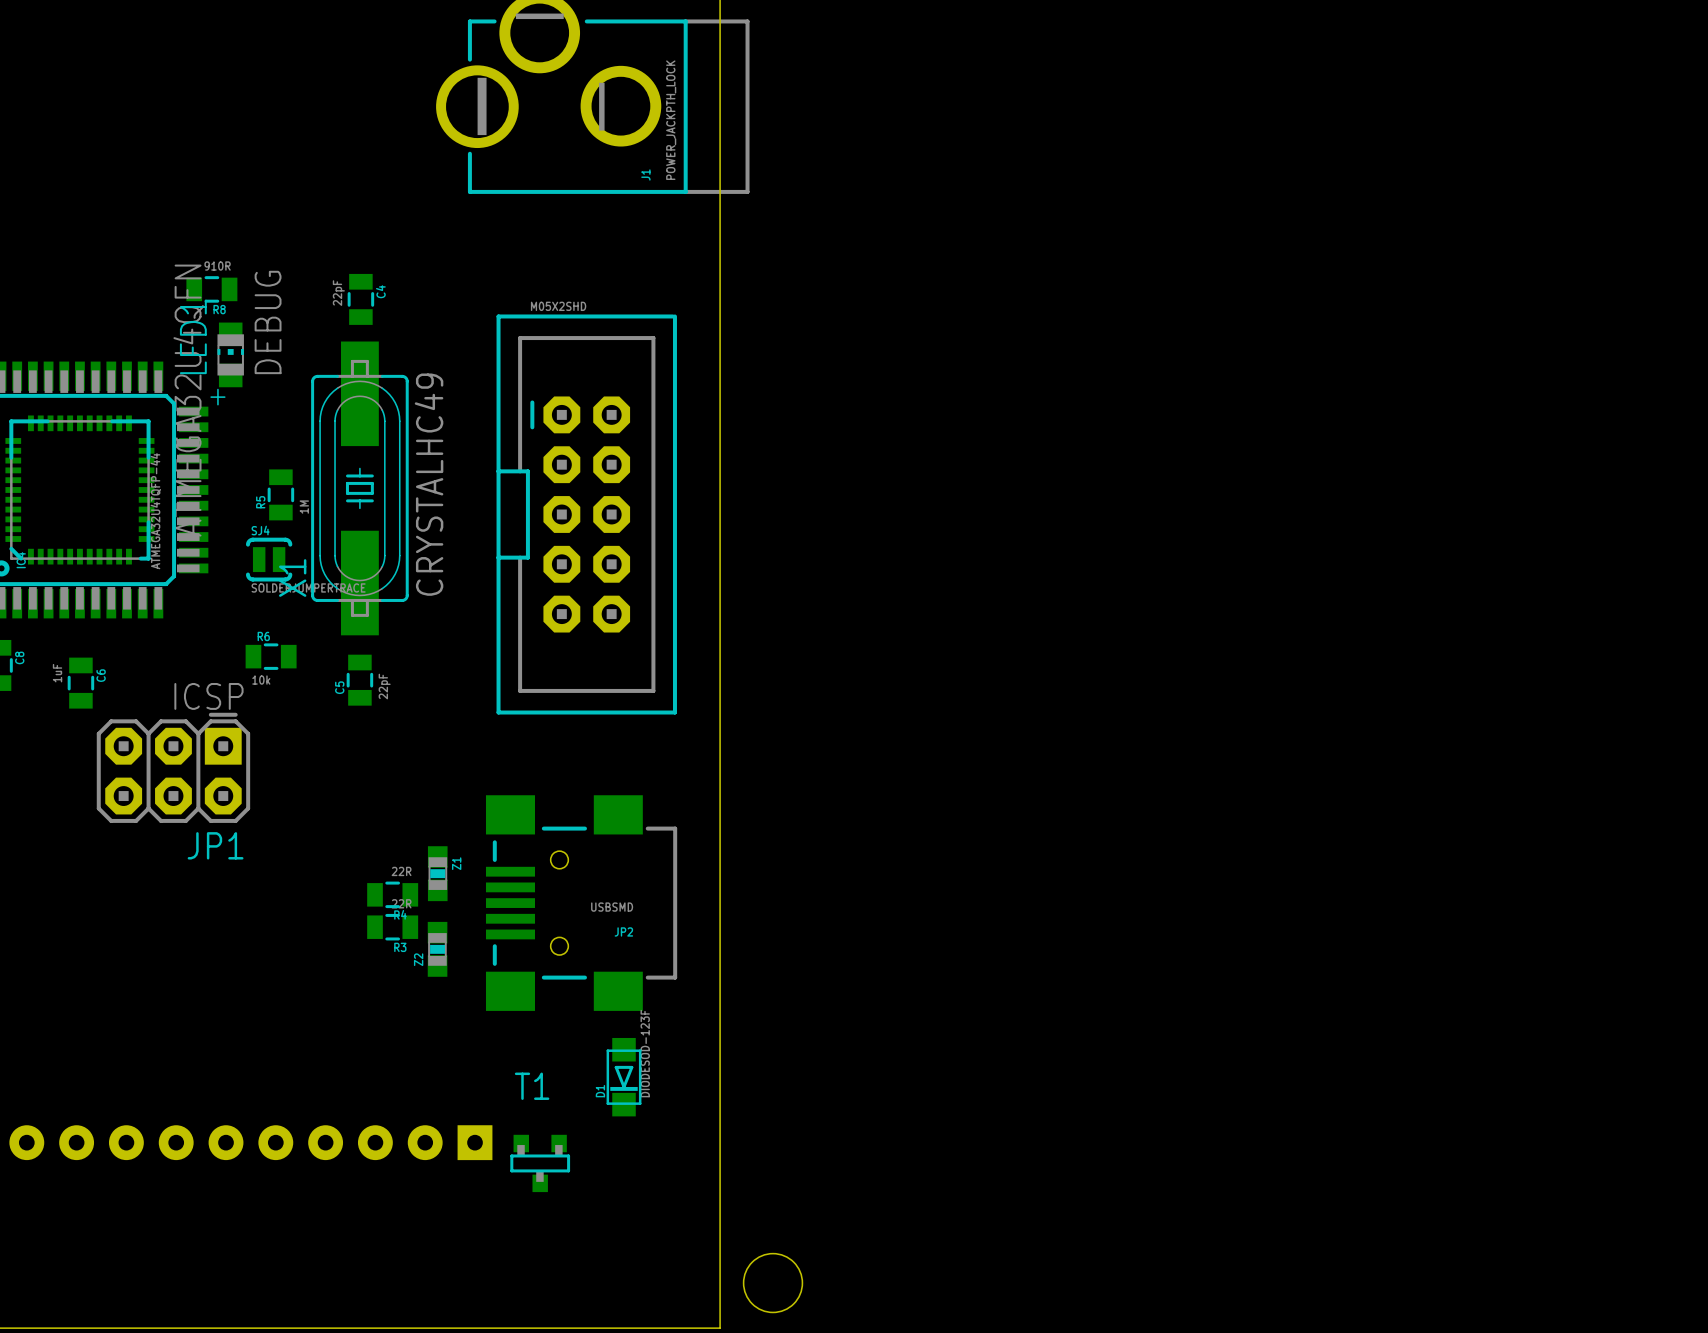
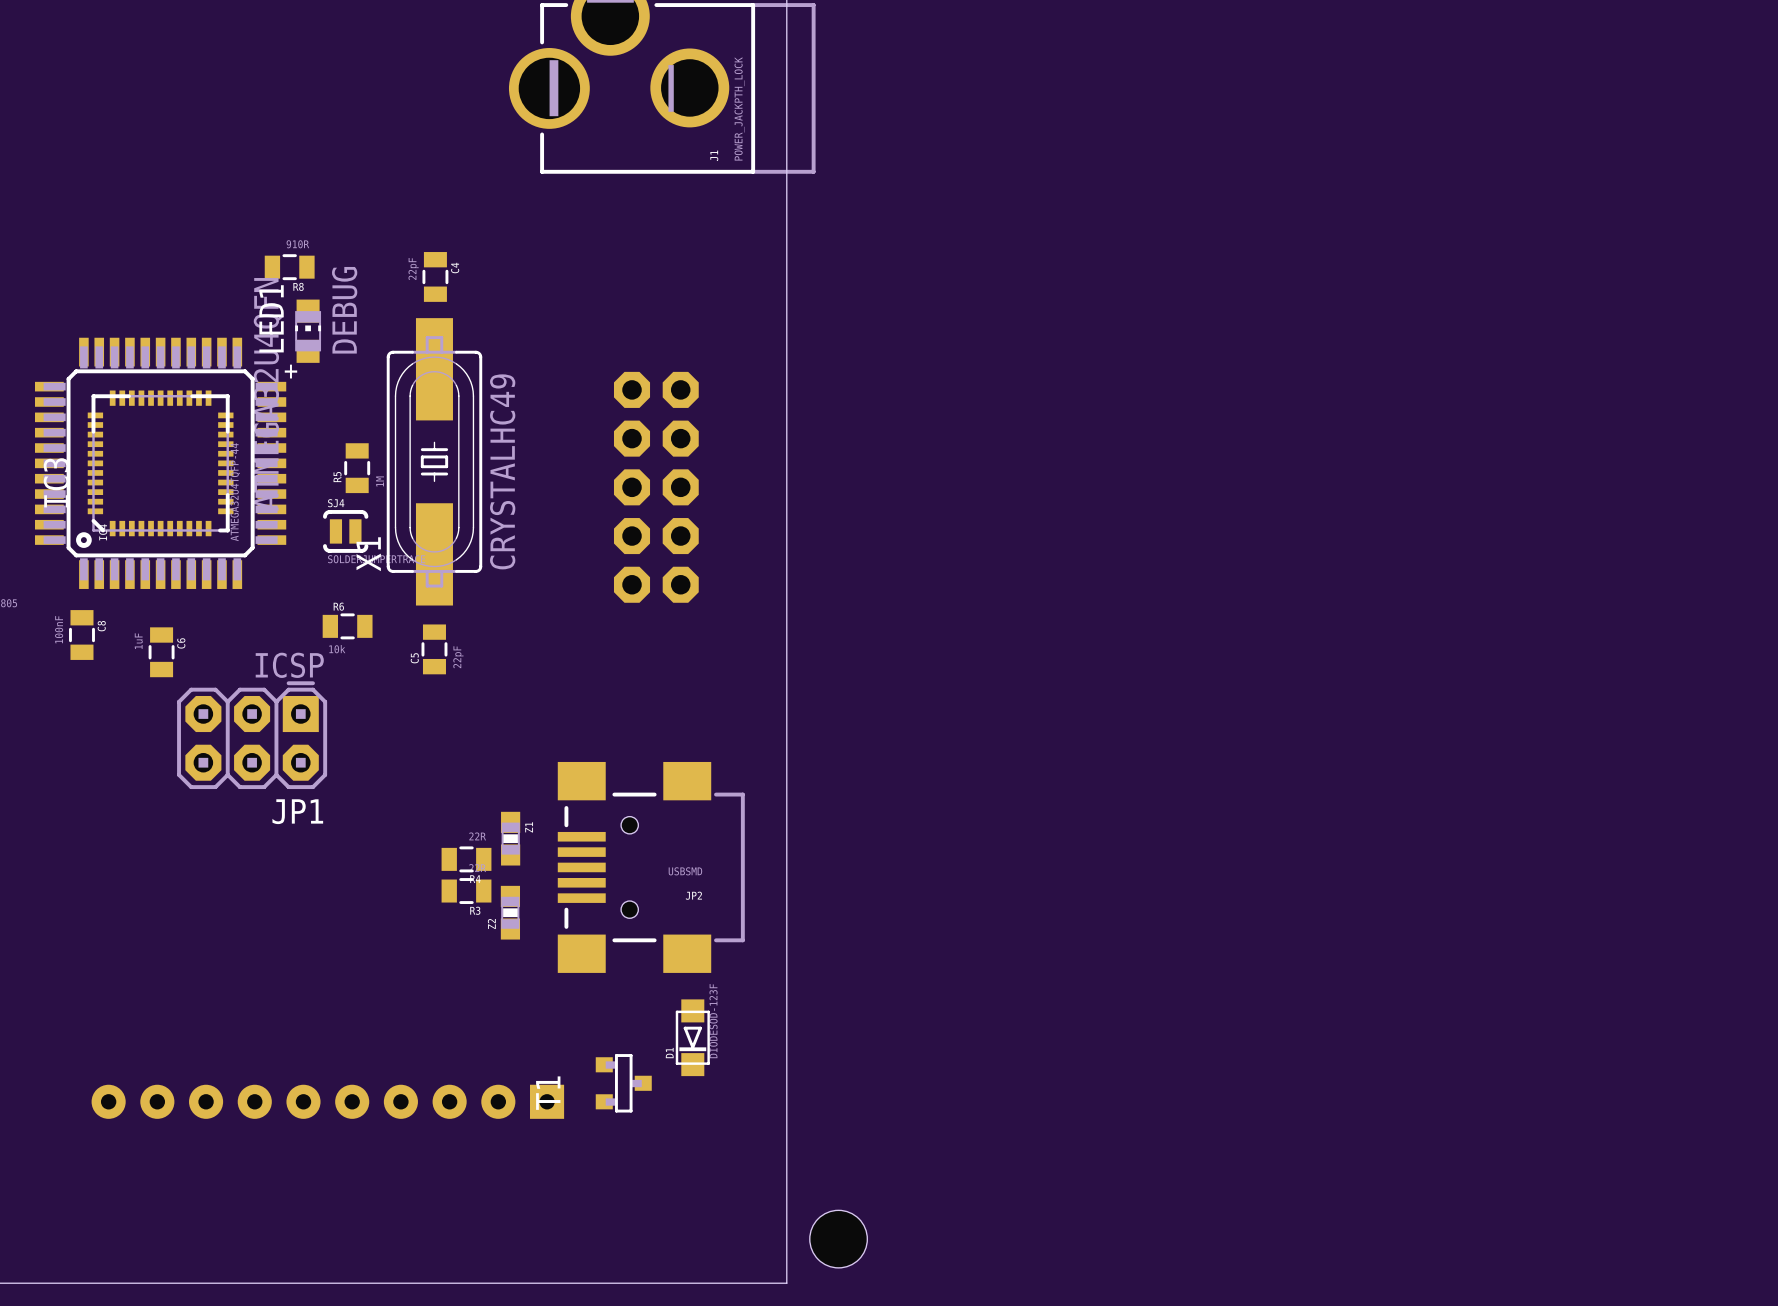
part side: bottom (586, 514) -> top (656, 487)
T1 rotation: 0° (540, 1163) -> 90° counterclockwise (623, 1083)
T1 position: (540, 1163) -> (623, 1083)

